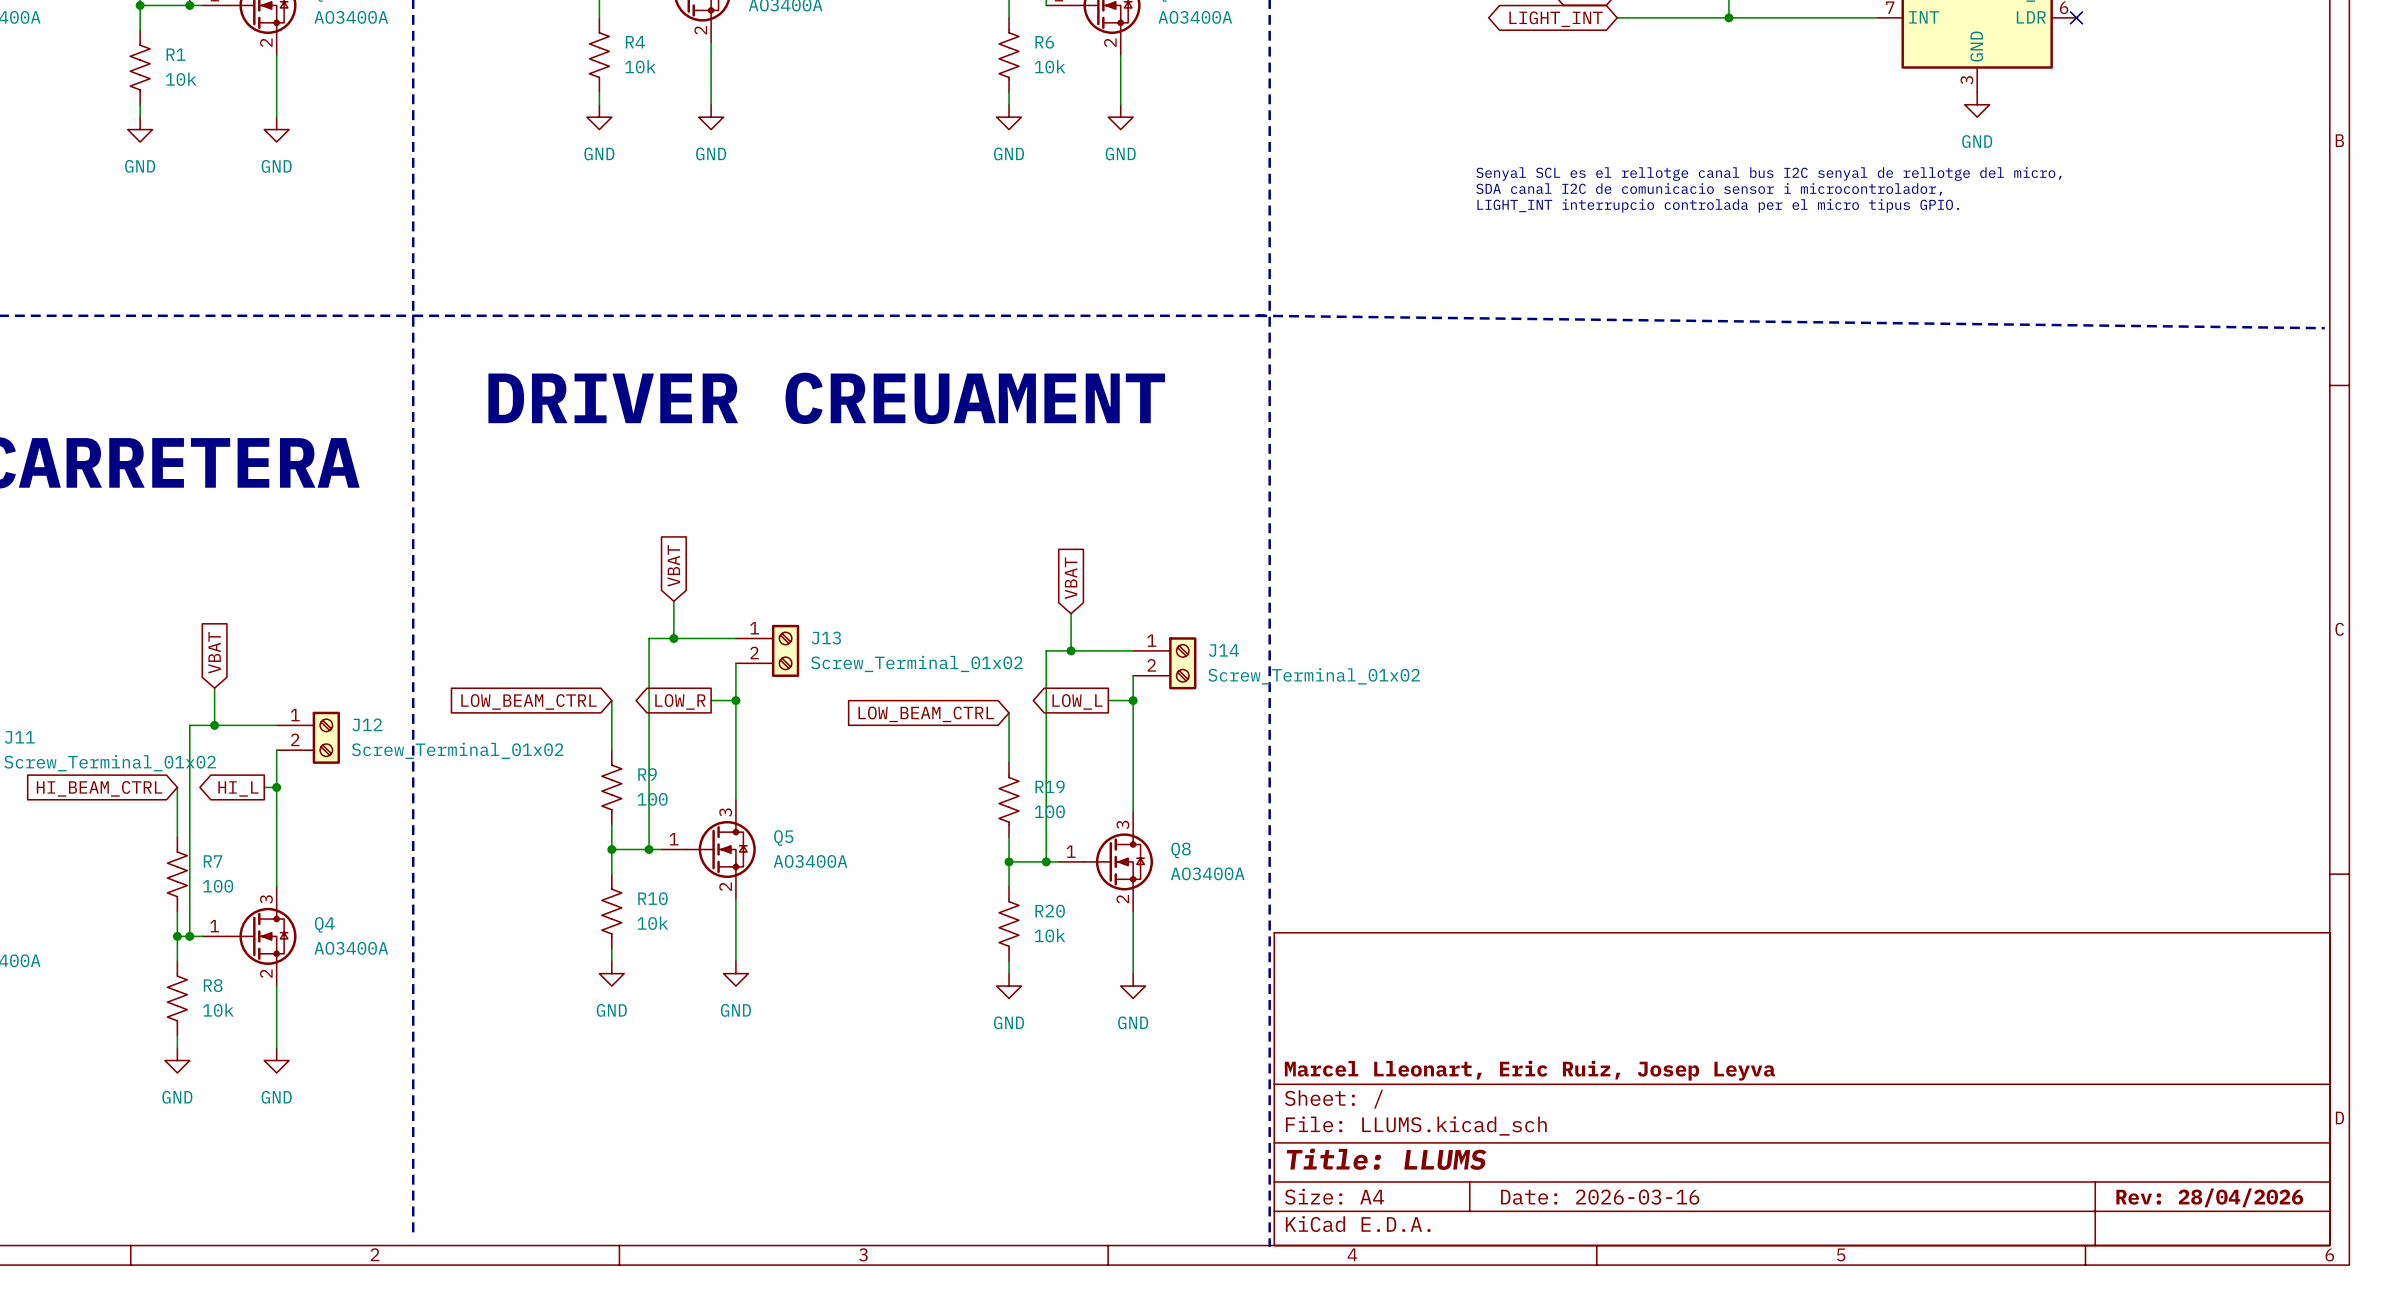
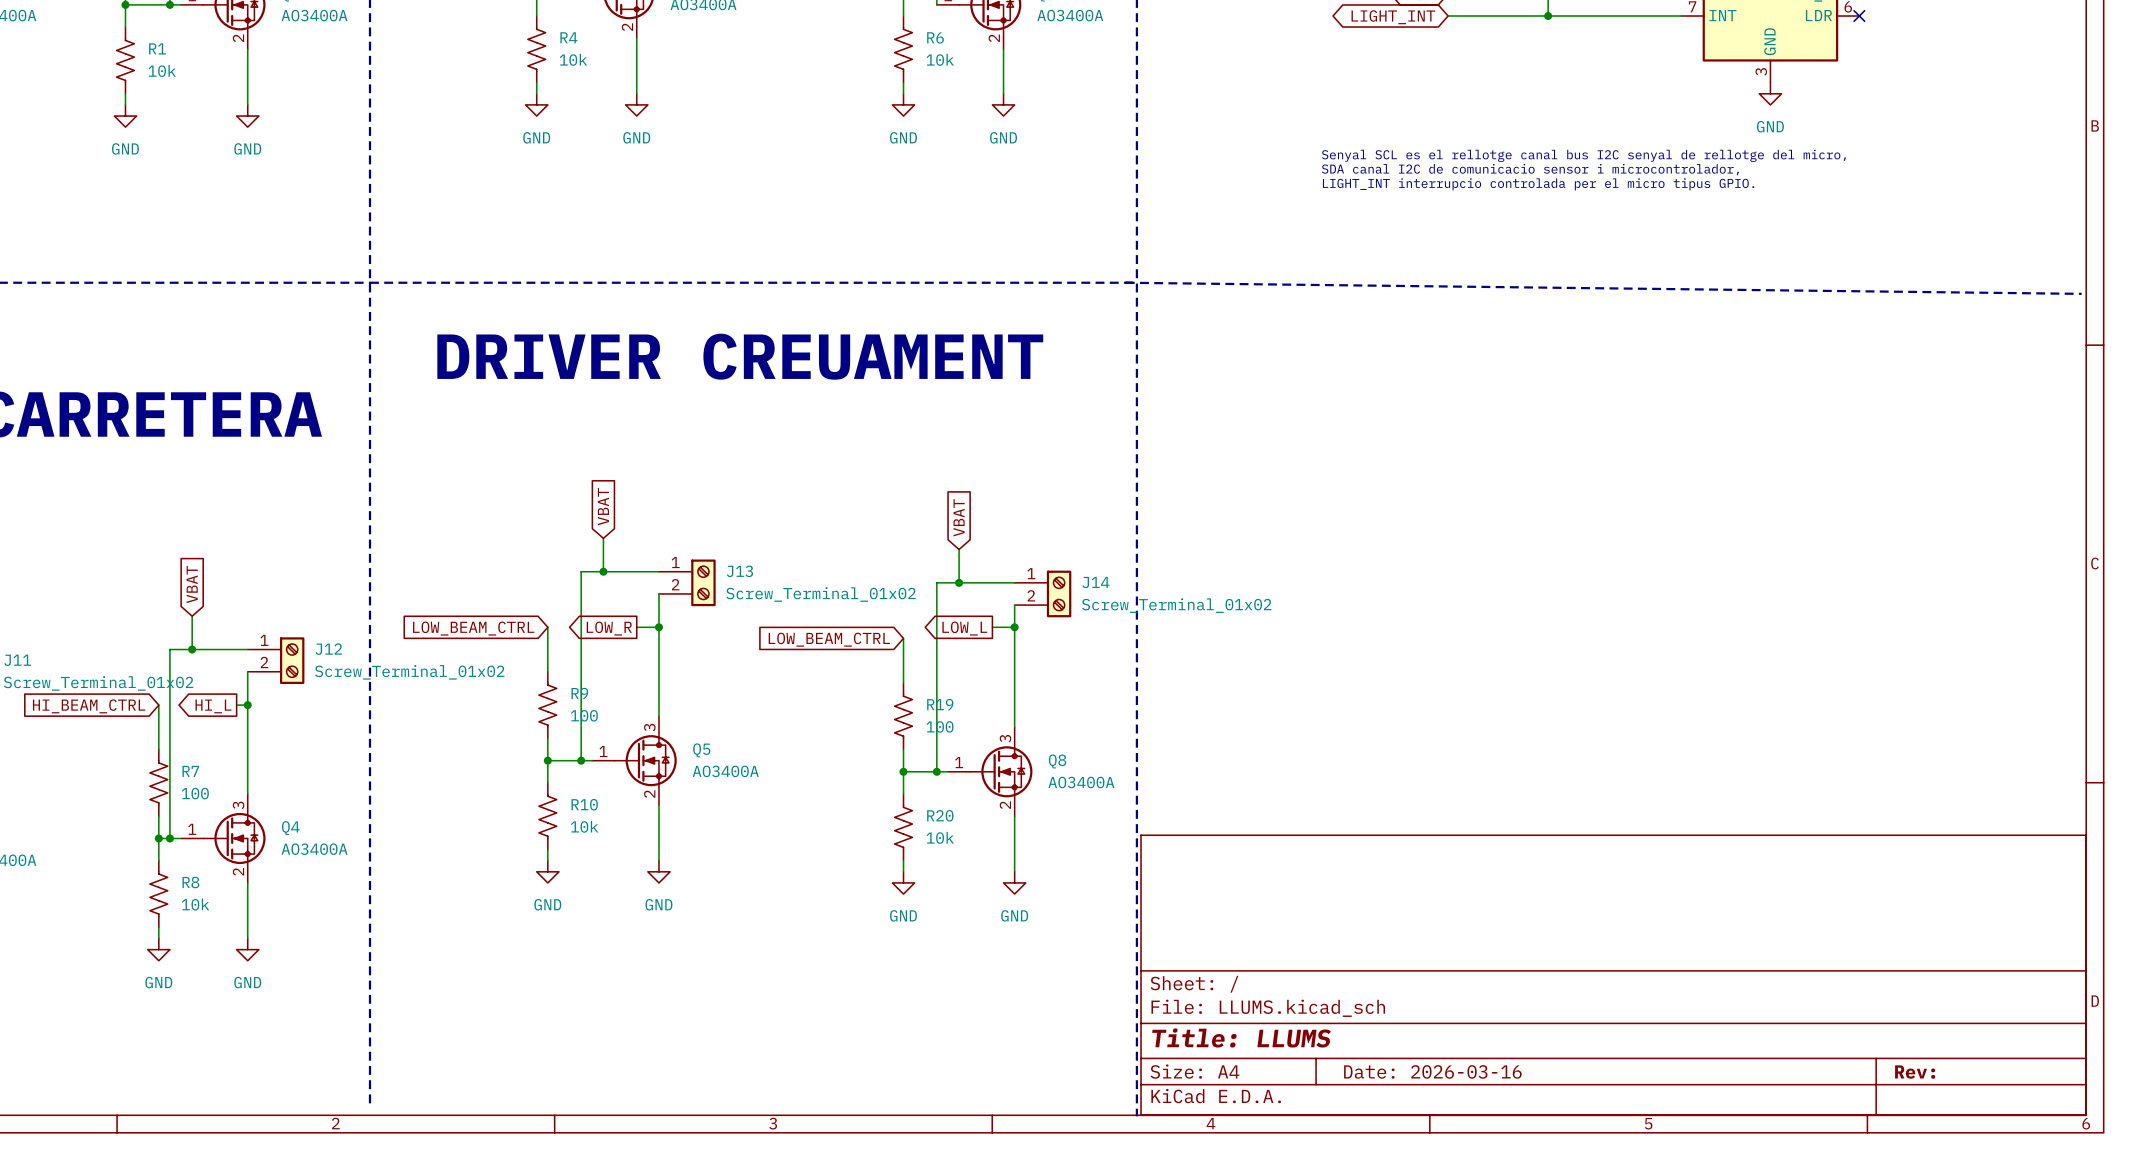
title block: Marcel Lleonart, Eric Ruiz, Josep Leyva (1529, 1070) -> none
title block: Rev: 28/04/2026 (2209, 1197) -> Rev: (1915, 1072)

